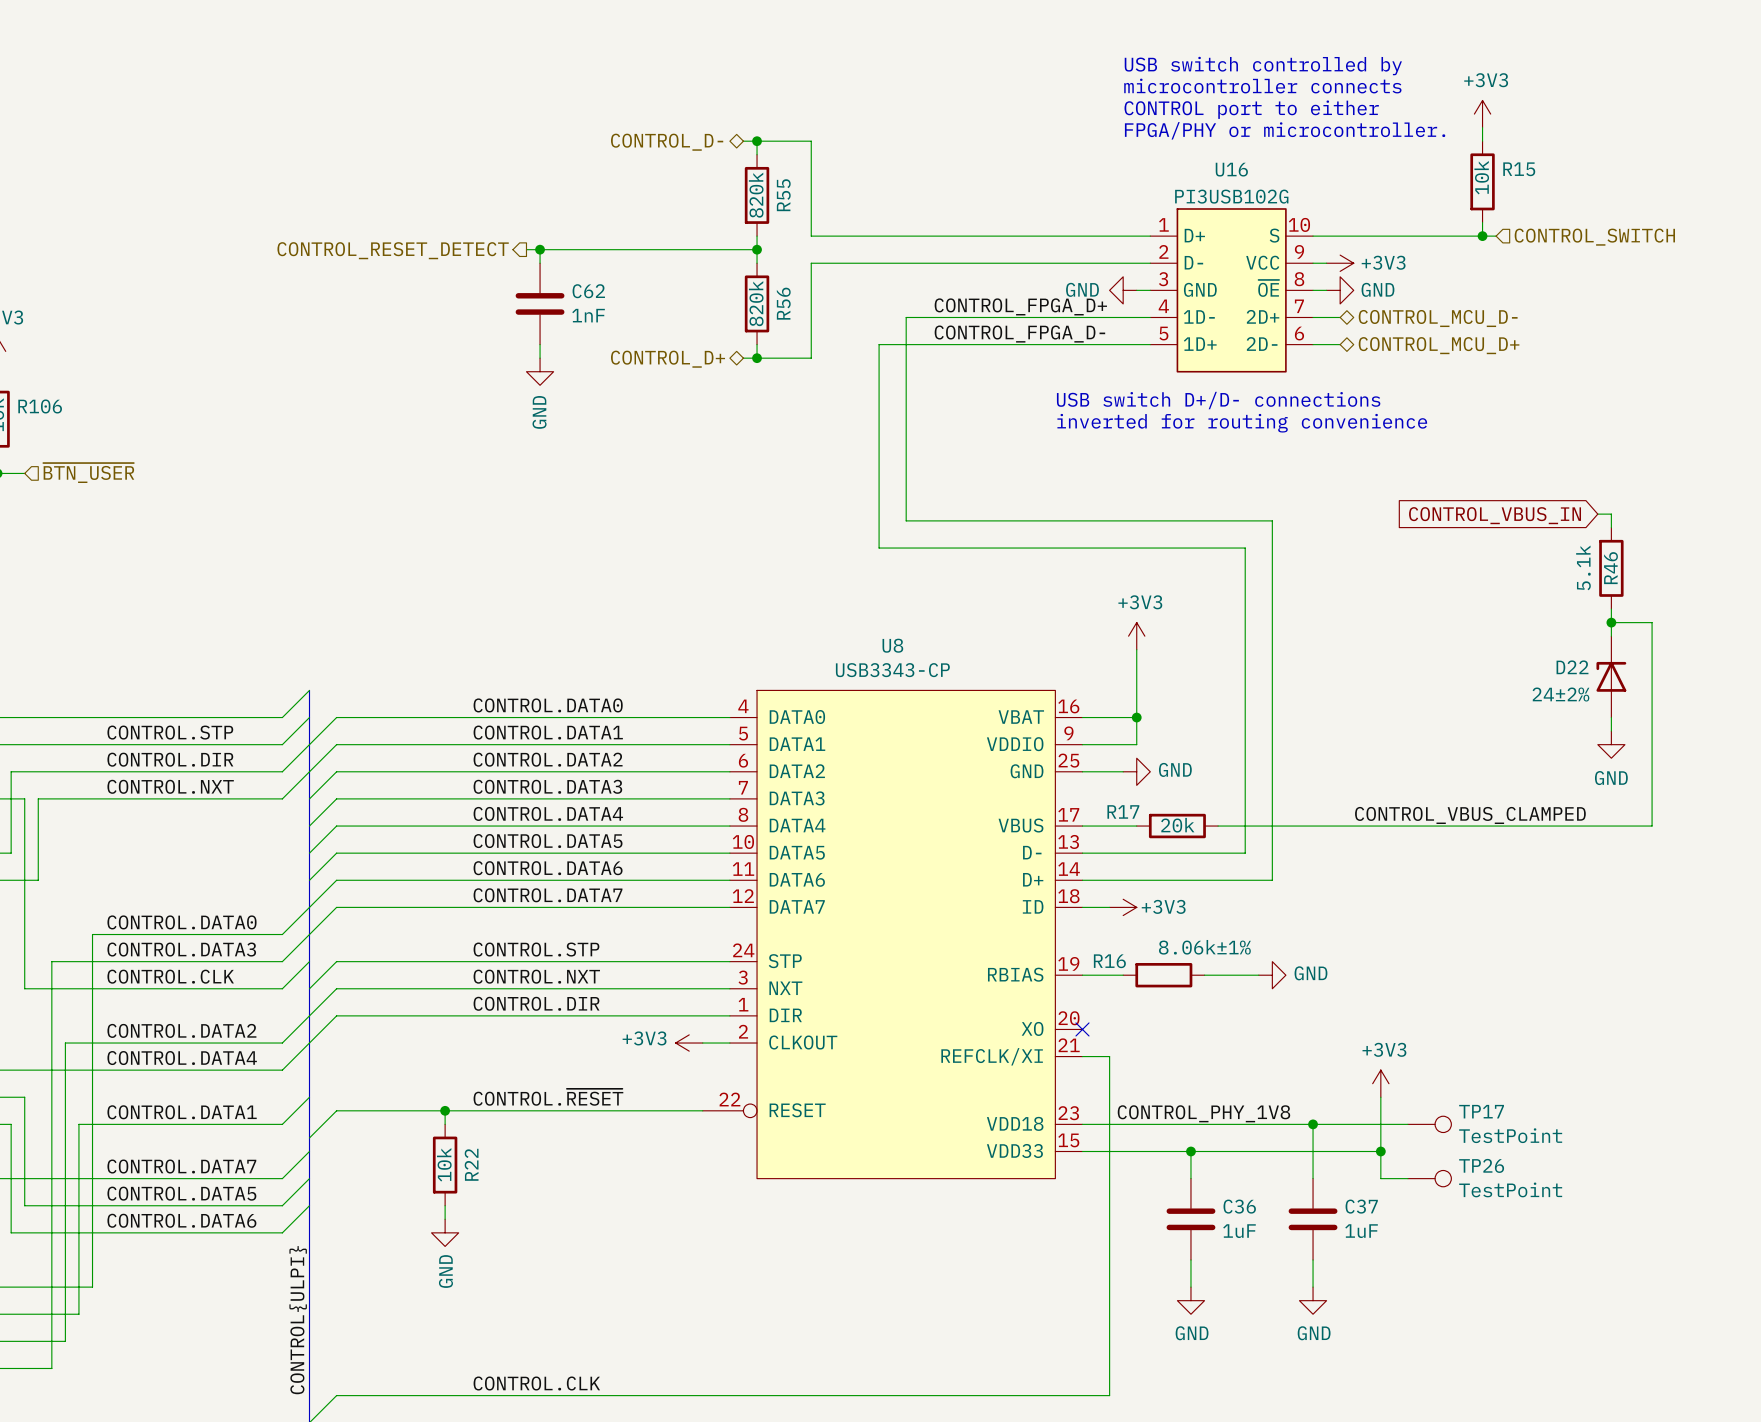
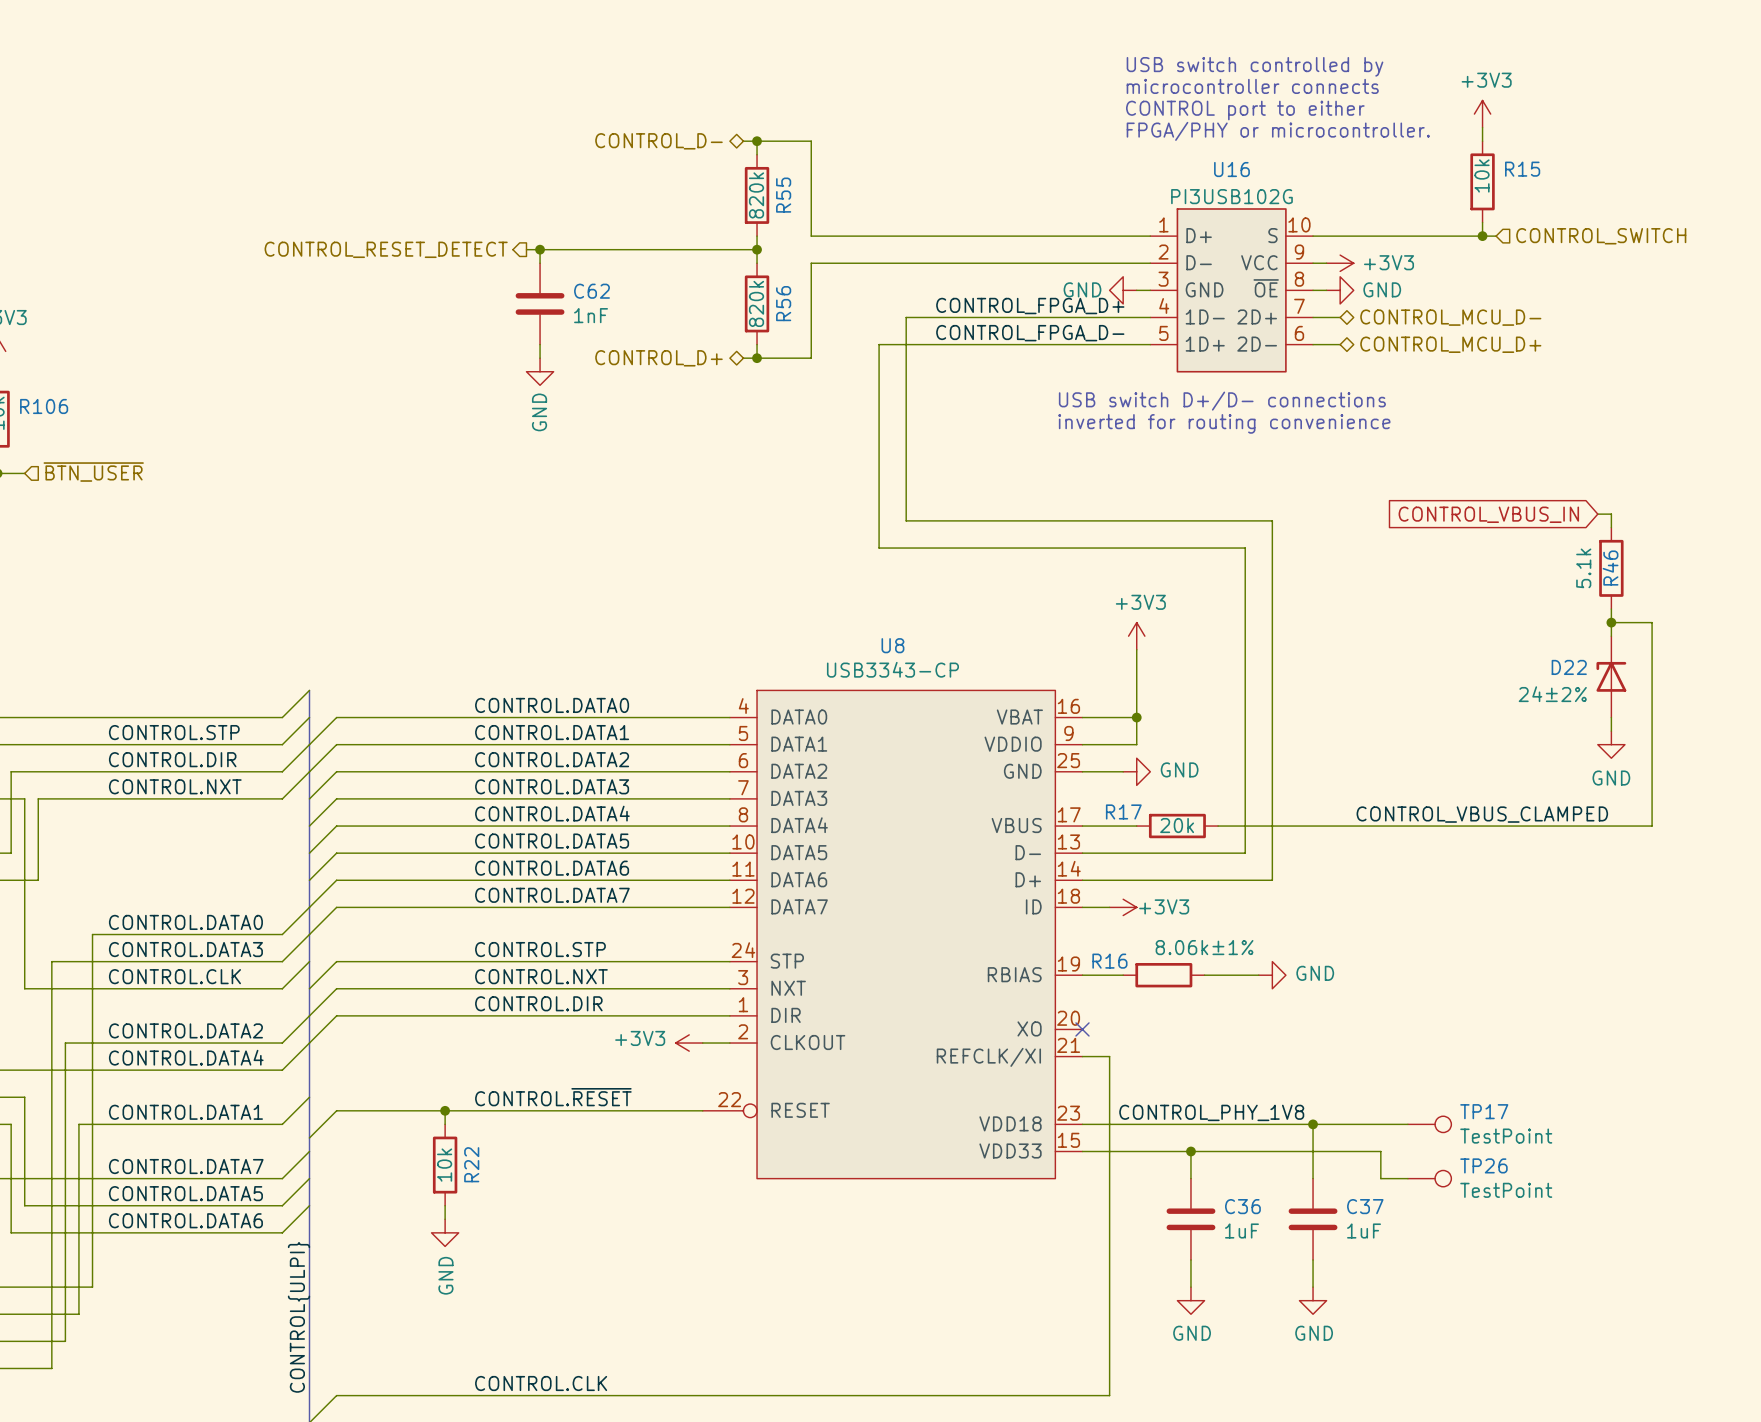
power symbol: +3V3 (1380, 1083) -> none
wire: (1380, 1097) (1380, 1151) -> none
junction: (1380, 1151) -> none

